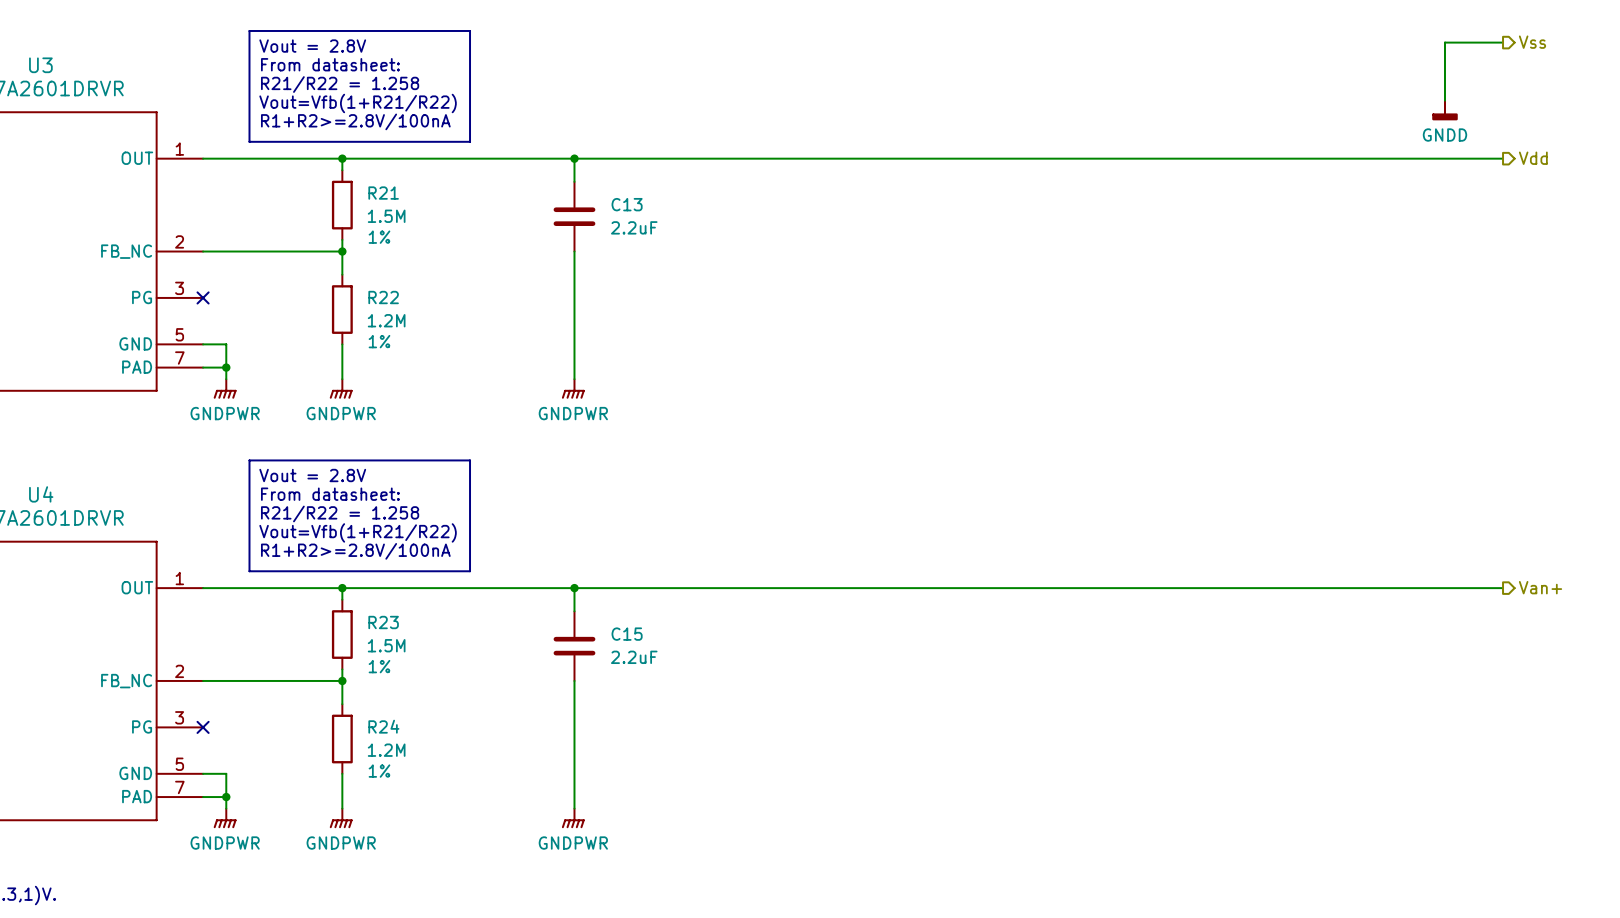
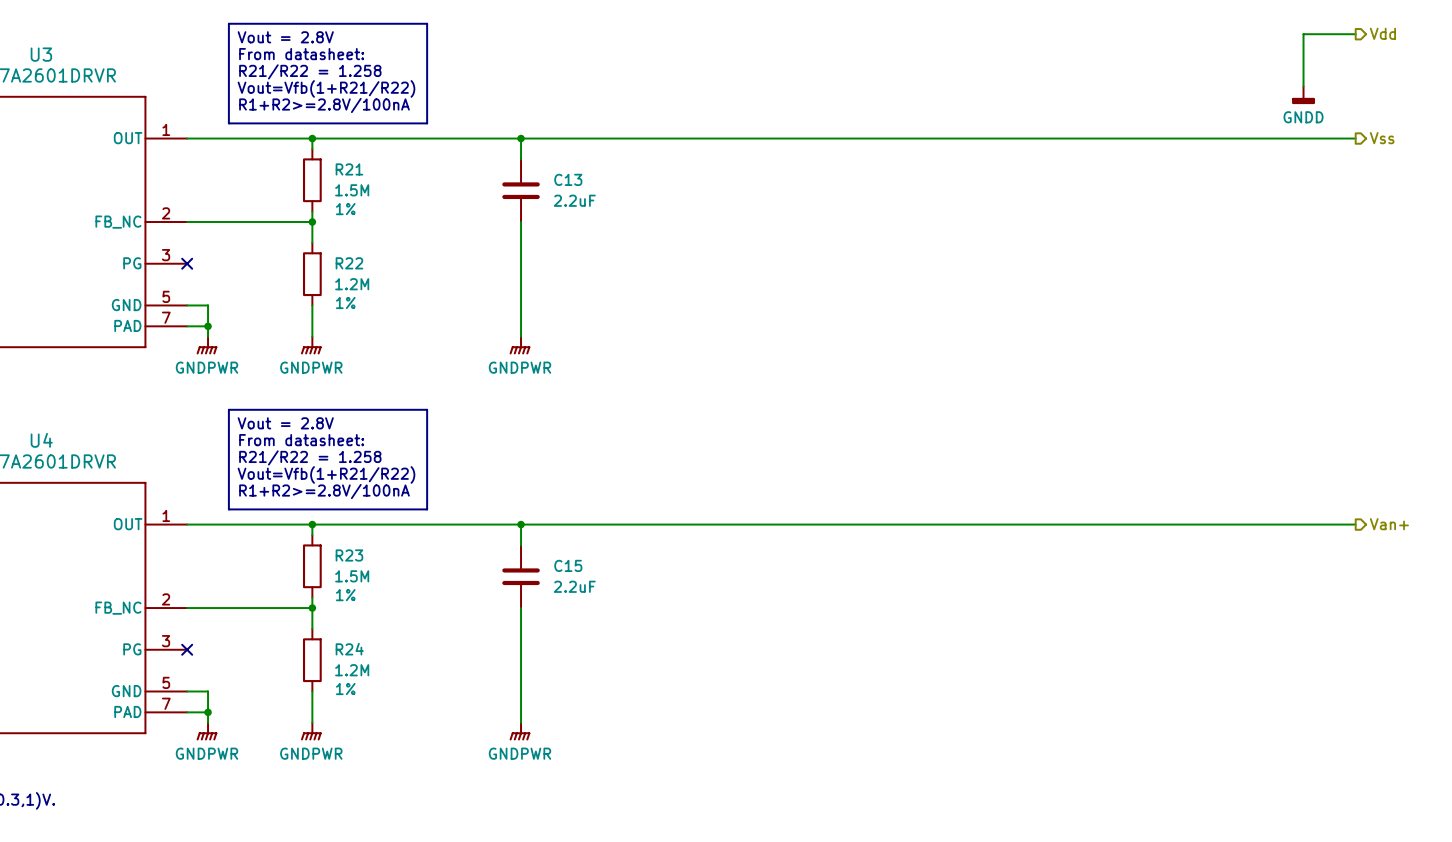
hierarchical label: Vss (1532, 42) -> Vdd (1382, 33)
hierarchical label: Vdd (1533, 158) -> Vss (1382, 138)

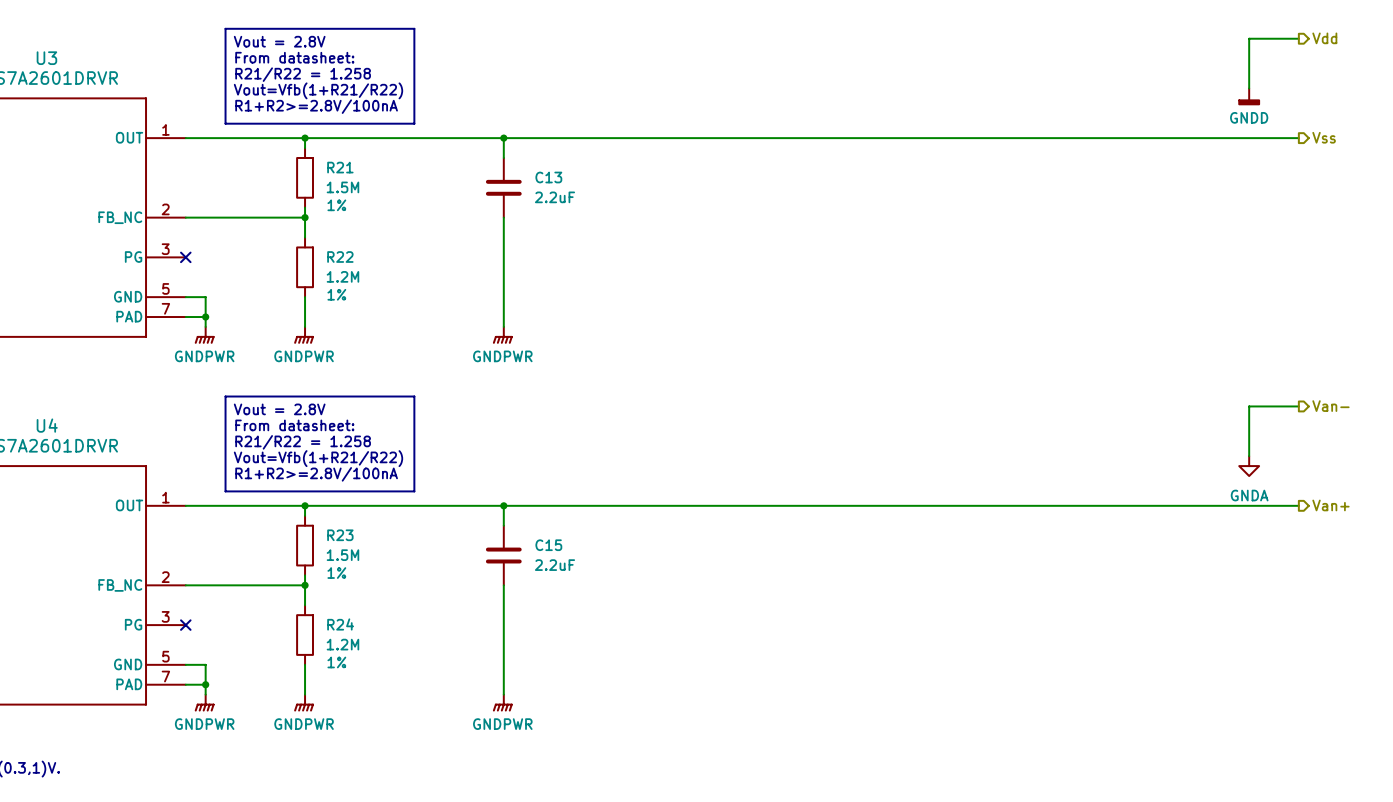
hierarchical label: none -> Van- (1330, 406)
wire: none -> (1298, 406) (1249, 406) (1249, 456)
power symbol: none -> GNDA (1249, 466)

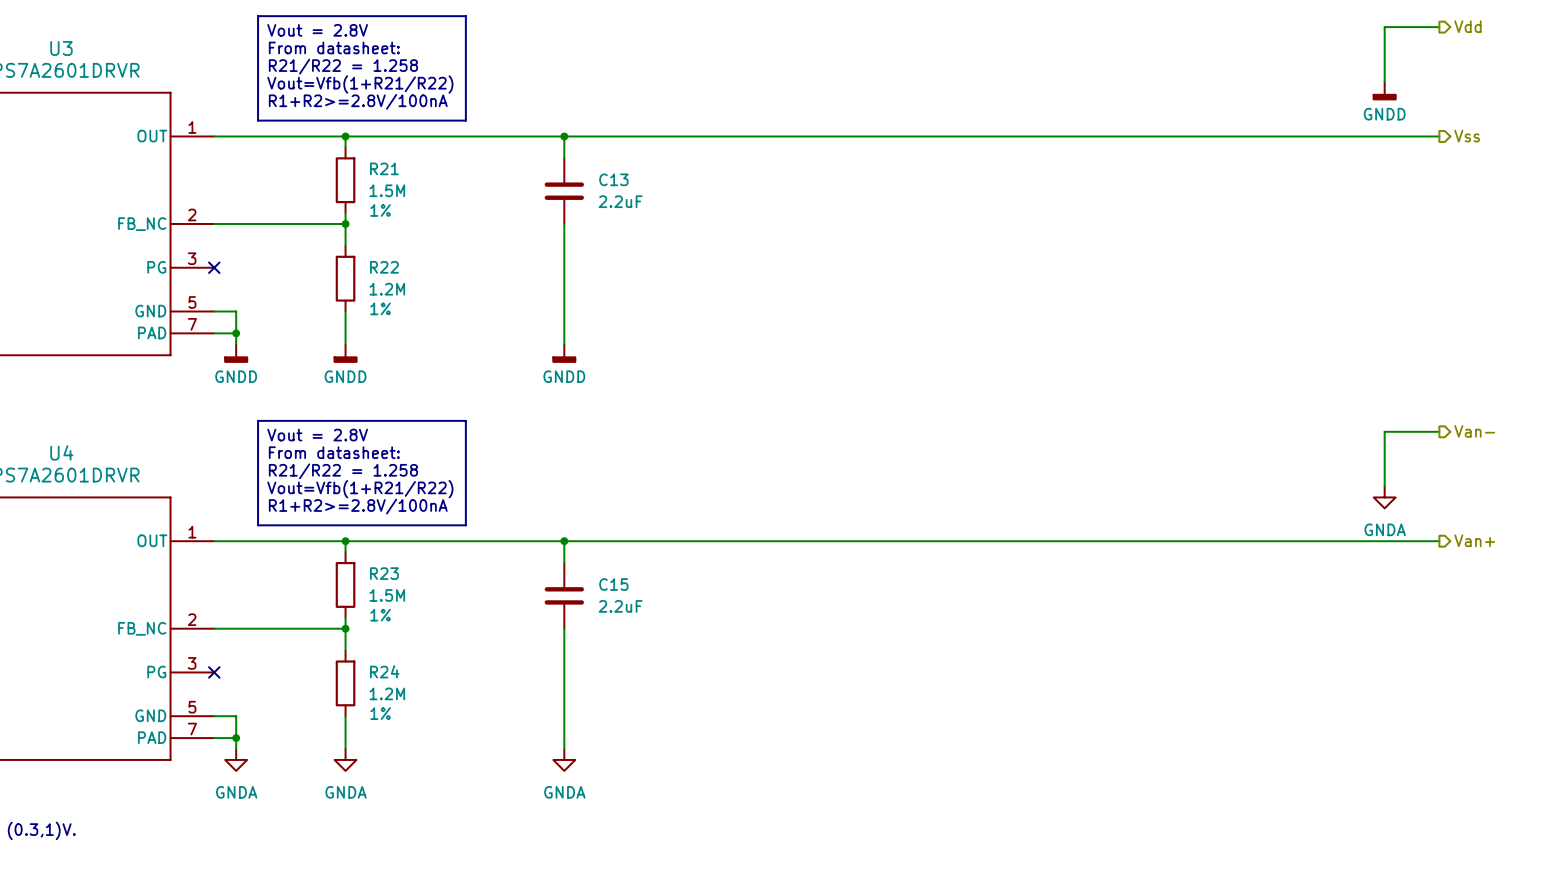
power symbol: GNDPWR (204, 335) -> GNDD (236, 353)
power symbol: GNDPWR (304, 335) -> GNDD (345, 353)
power symbol: GNDPWR (502, 335) -> GNDD (564, 353)
power symbol: GNDPWR (204, 703) -> GNDA (236, 759)
power symbol: GNDPWR (304, 703) -> GNDA (345, 759)
power symbol: GNDPWR (502, 703) -> GNDA (564, 759)

